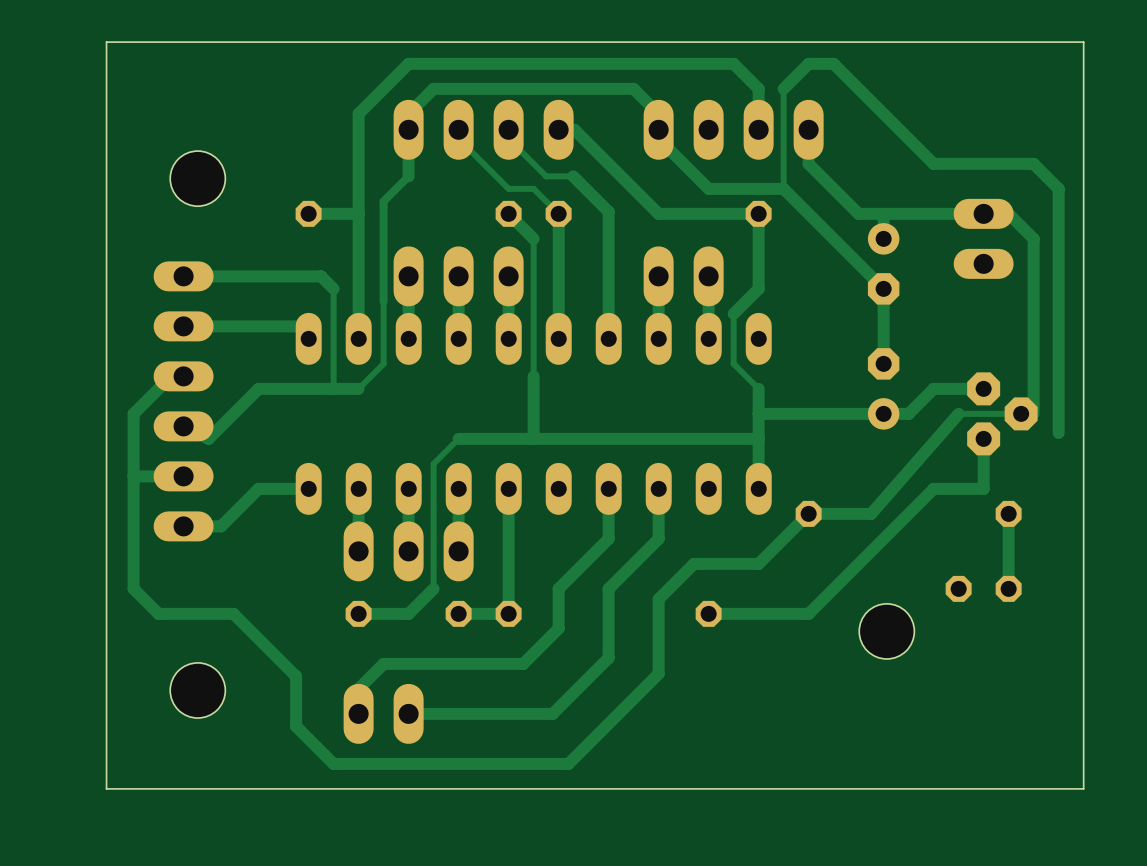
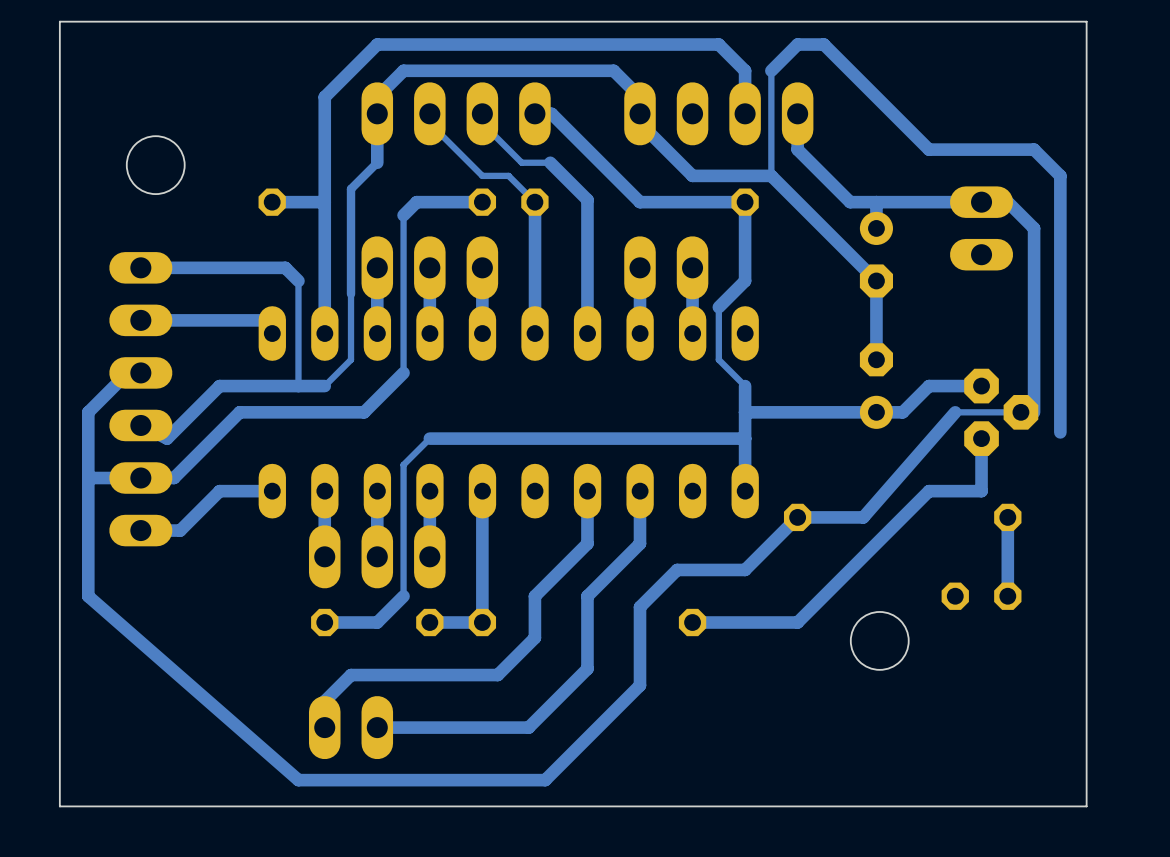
track: (508, 213) (533, 238) (533, 438) -> (482, 202) (416, 202) (403, 215) (403, 372) (364, 412) (239, 412) (174, 478) (140, 478)
track: (133, 588) (158, 613) (233, 613) (296, 676) (296, 726) (333, 763) -> (88, 596) (298, 780)
hole: (197, 690) -> none

